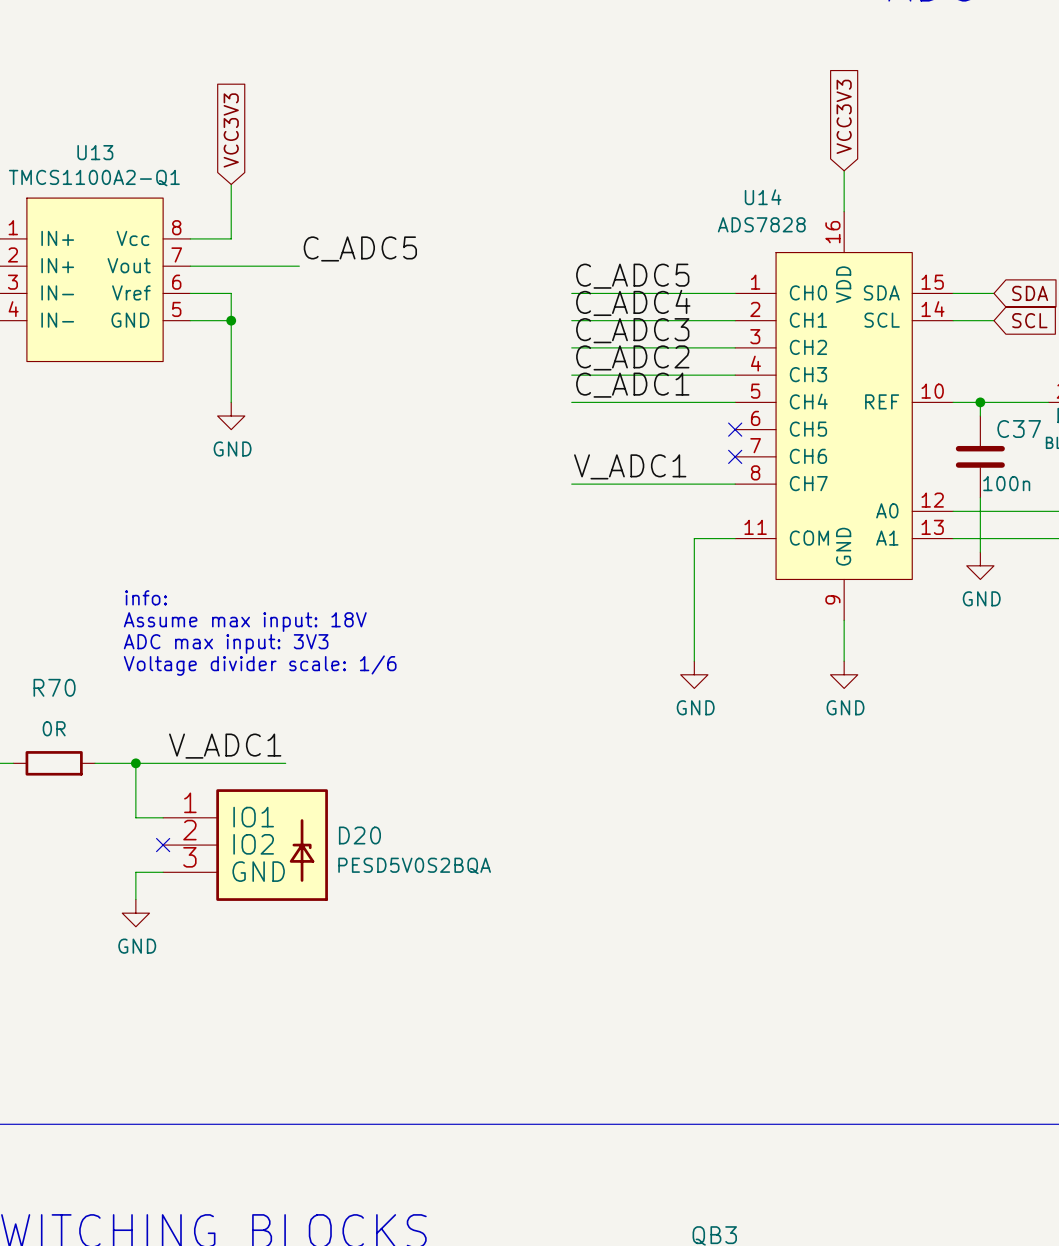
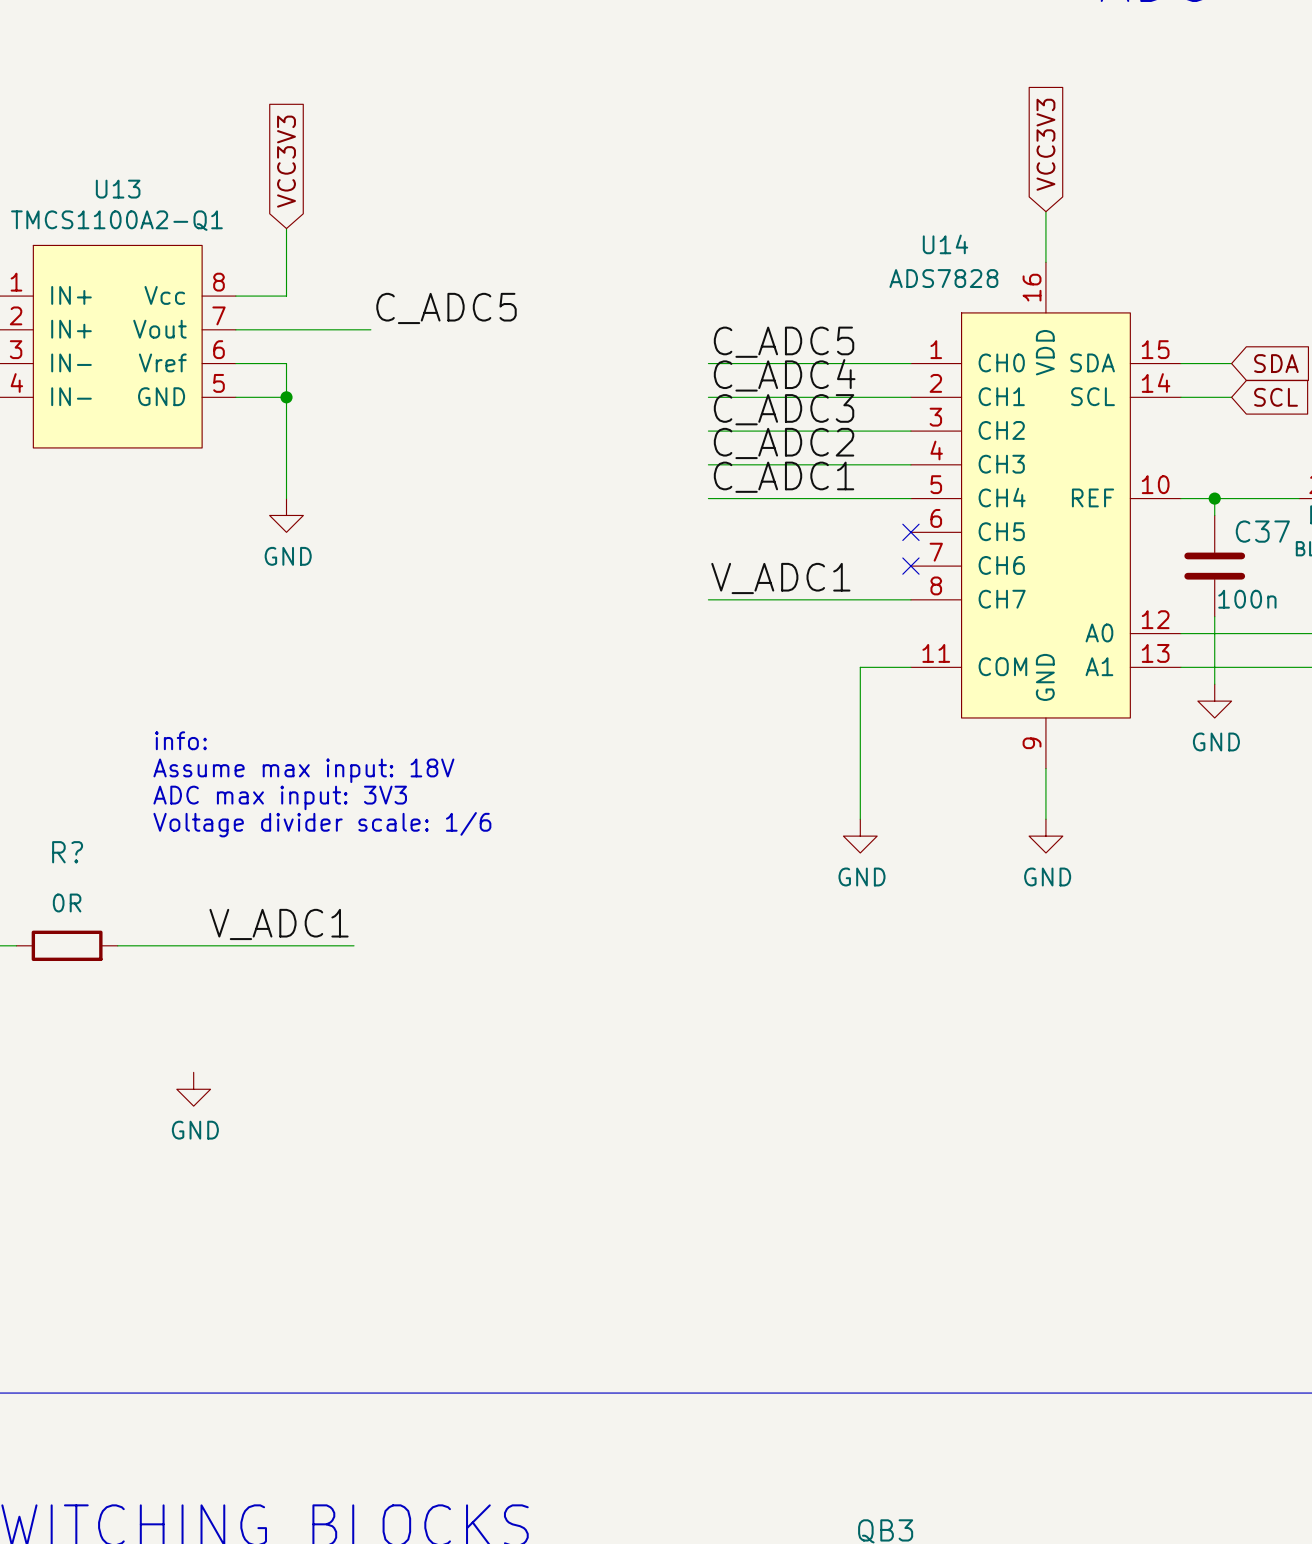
R70 name: R70 (54, 687) -> R? (67, 852)
wire: (135, 763) (135, 817) (163, 817) -> none
junction: (135, 763) -> none
no-connect mark: (163, 845) -> none
D20: (245, 845) -> none
wire: (163, 872) (135, 872) (135, 899) -> none
power symbol position: GND (135, 913) -> GND (193, 1089)

